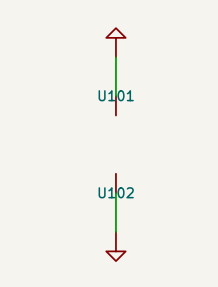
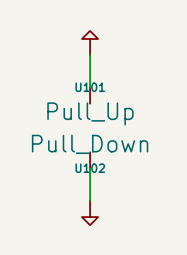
U101 value: none -> Pull_Up (90, 113)
U102 value: none -> Pull_Down (90, 144)

